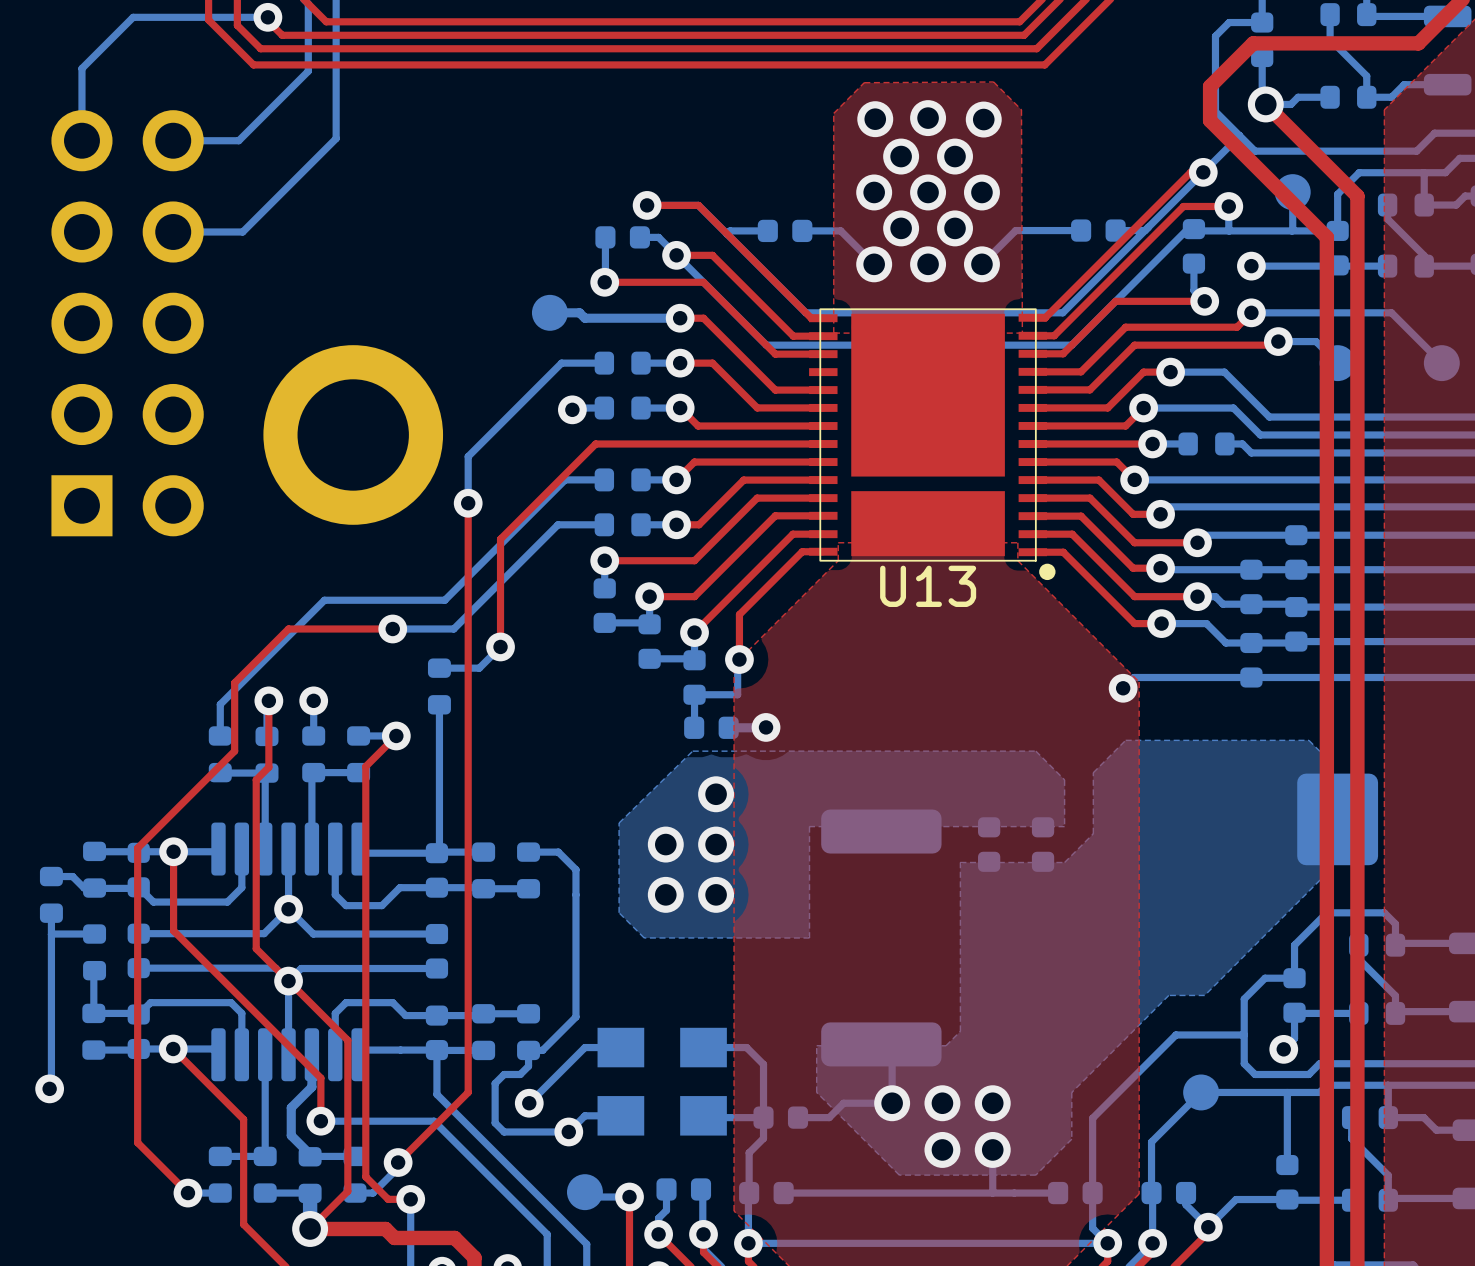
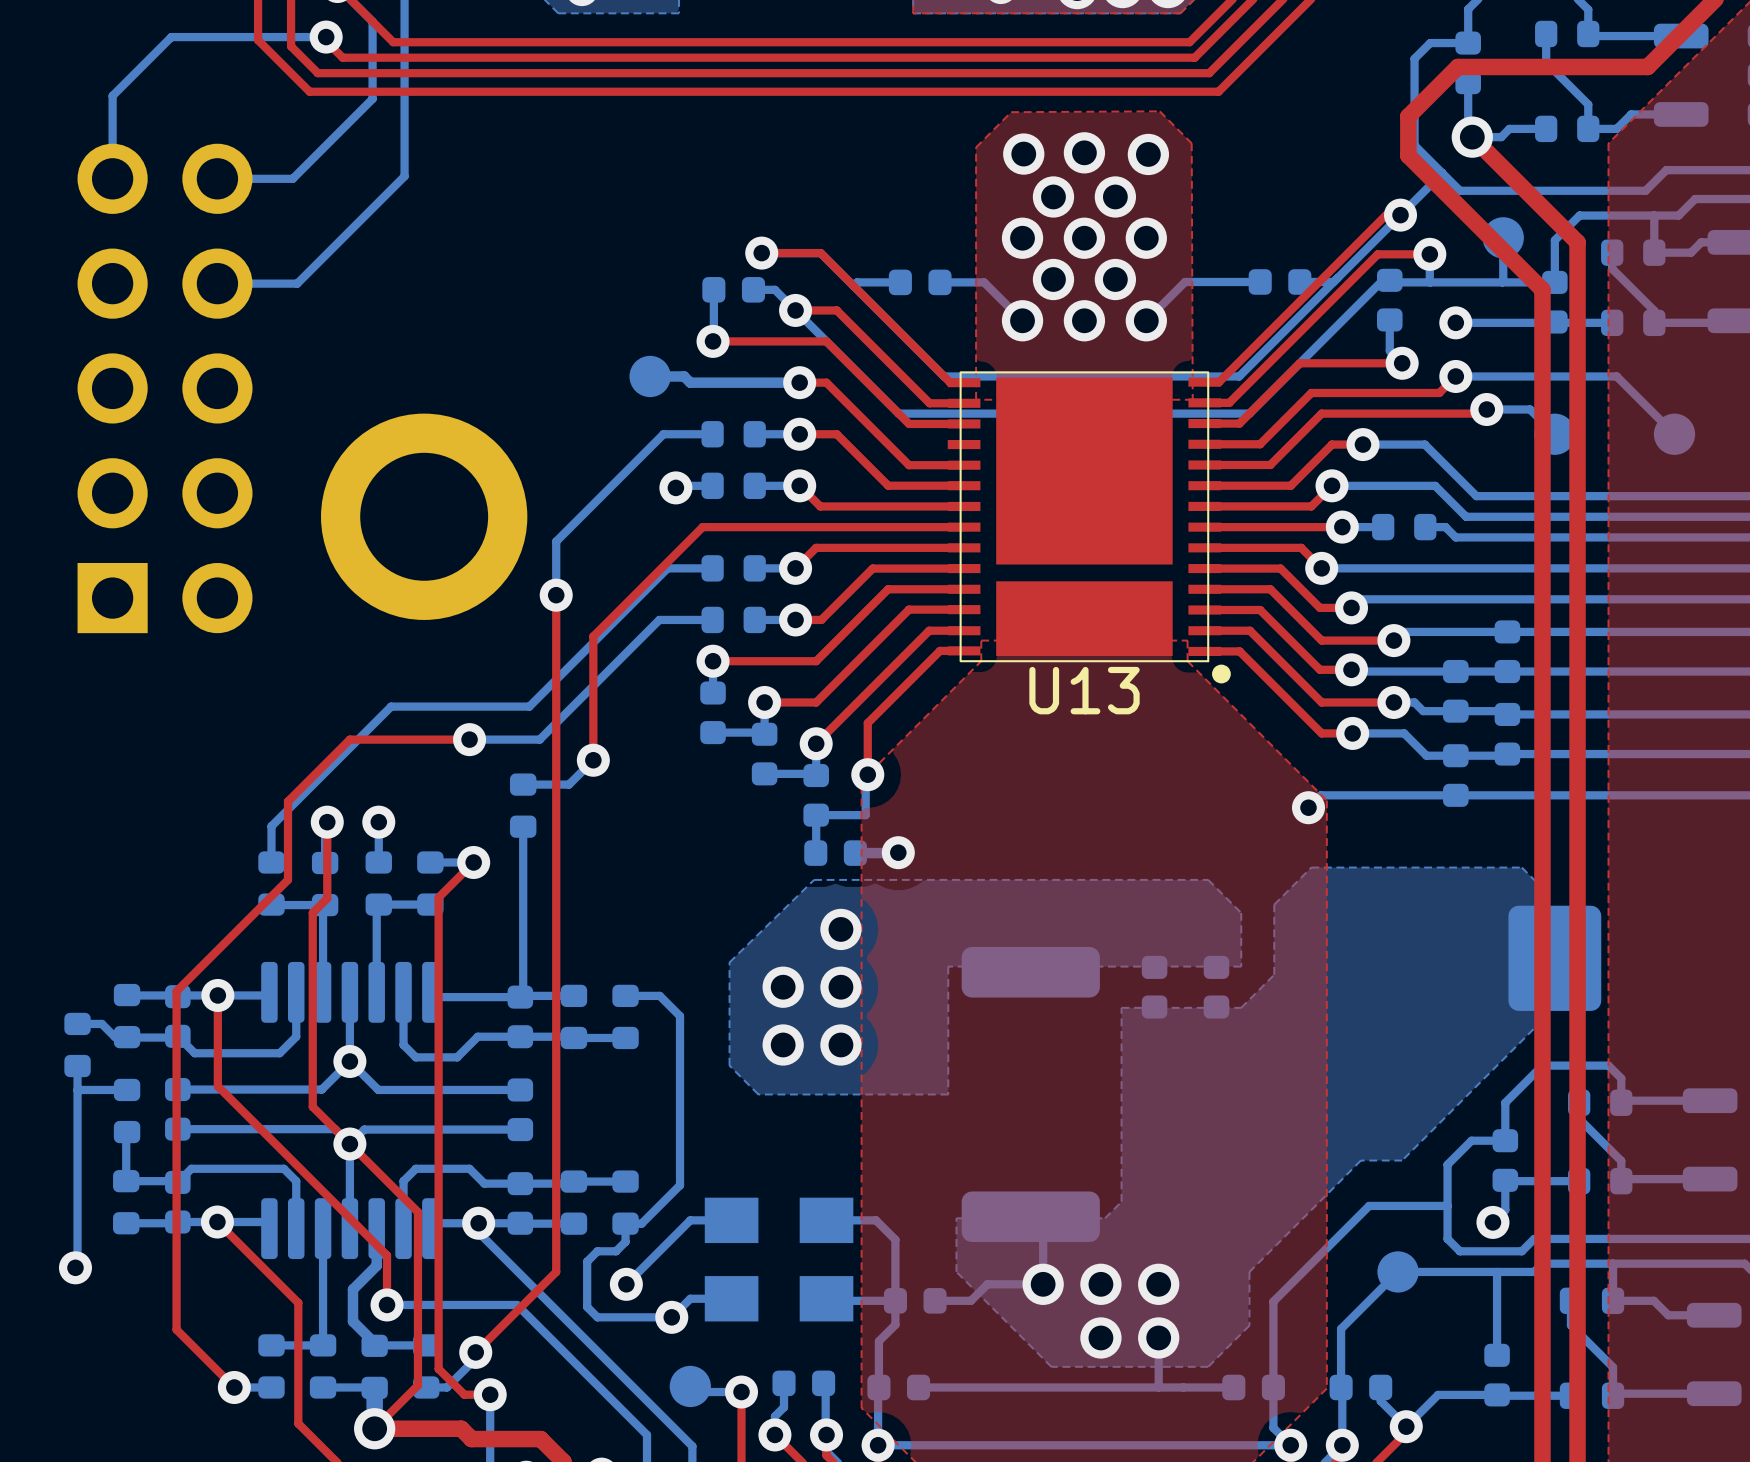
via: none -> (478, 1223)
bottom track: (436, 1050) (436, 1094) -> (478, 1223) (478, 1232) (520, 1274)

